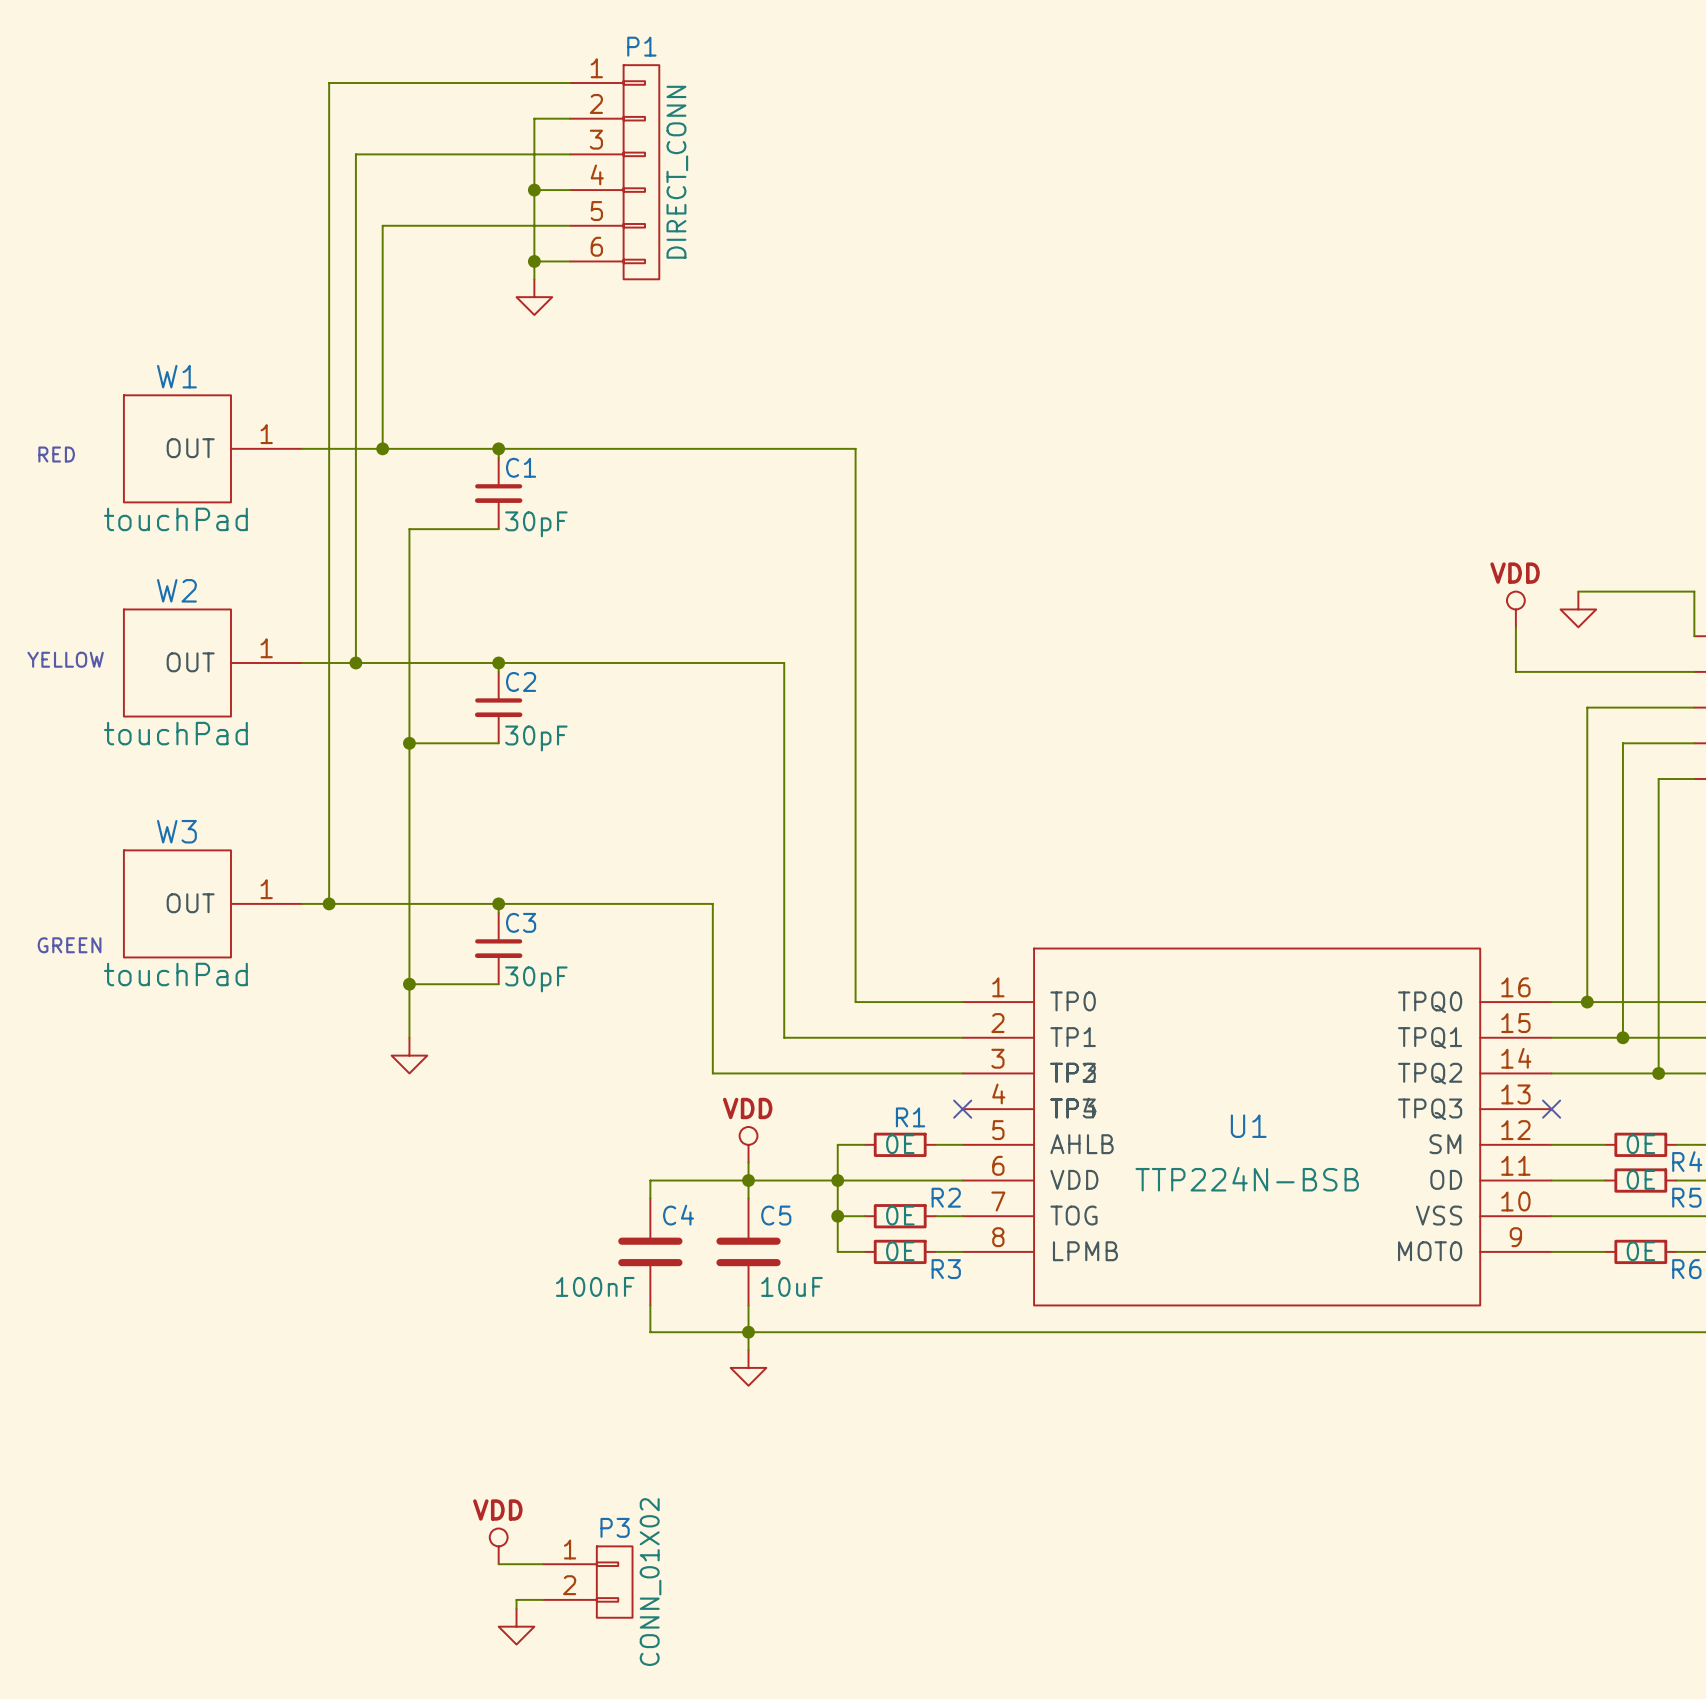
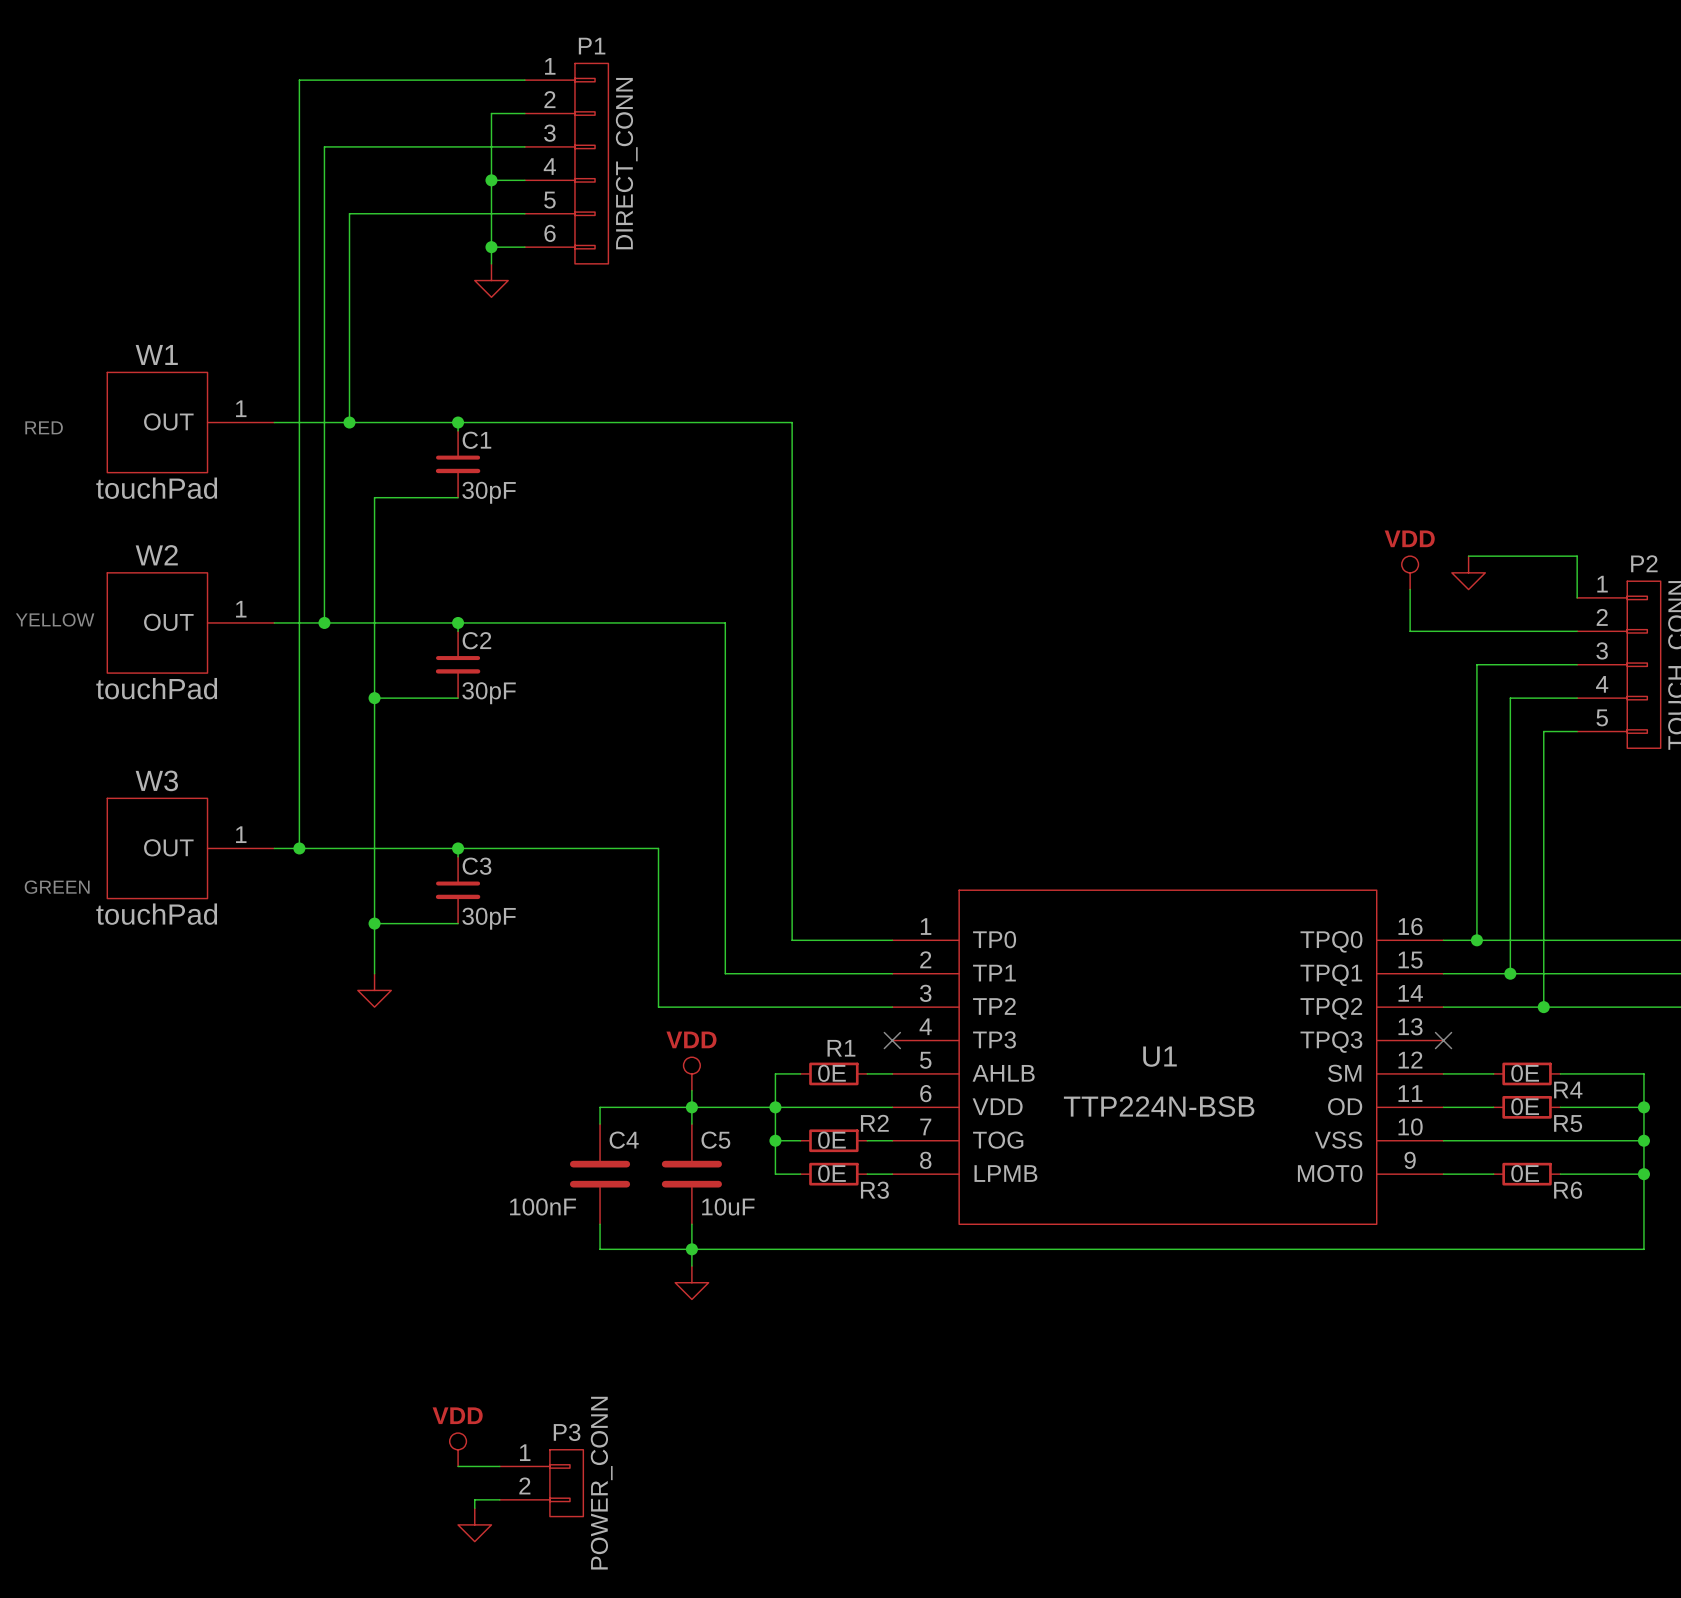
U1 symbol: [962, 948, 1552, 1306] -> [892, 890, 1444, 1225]
P3 value: CONN_01X02 (650, 1582) -> POWER_CONN (601, 1483)

